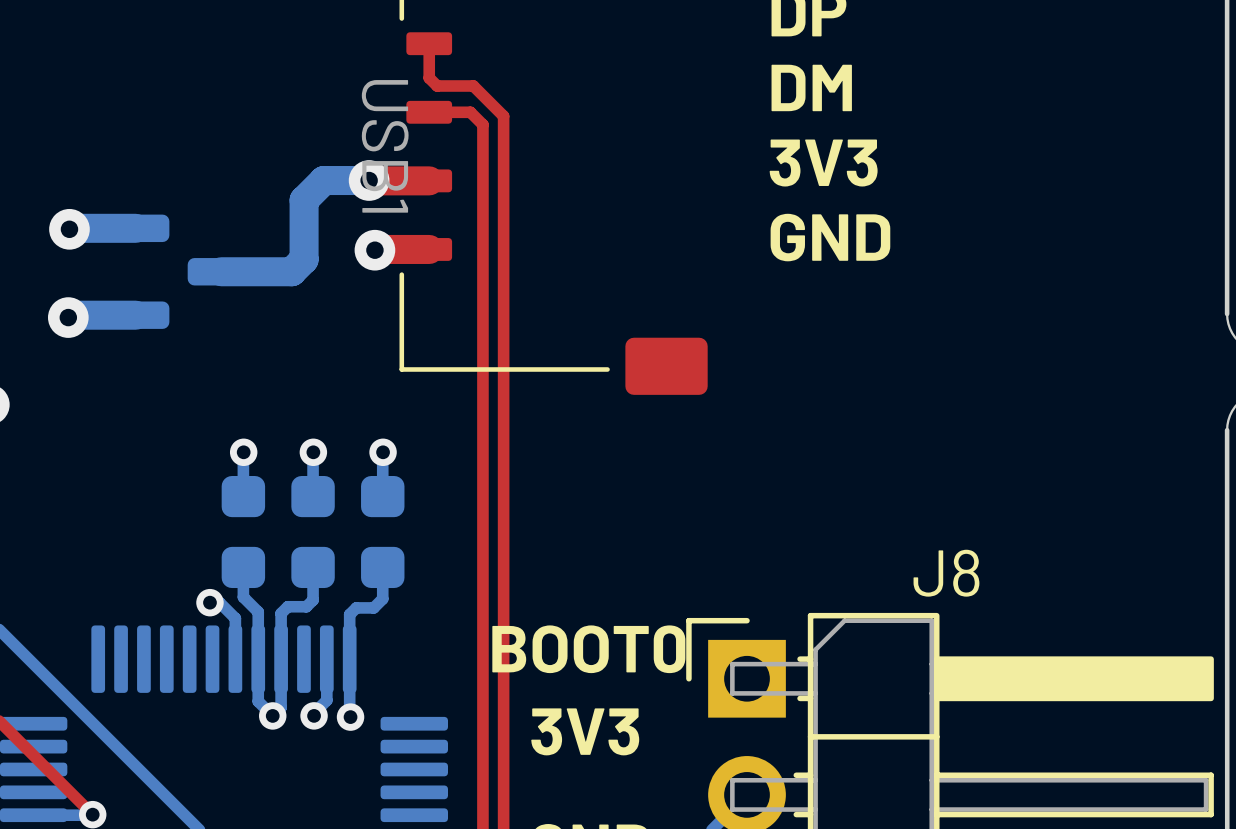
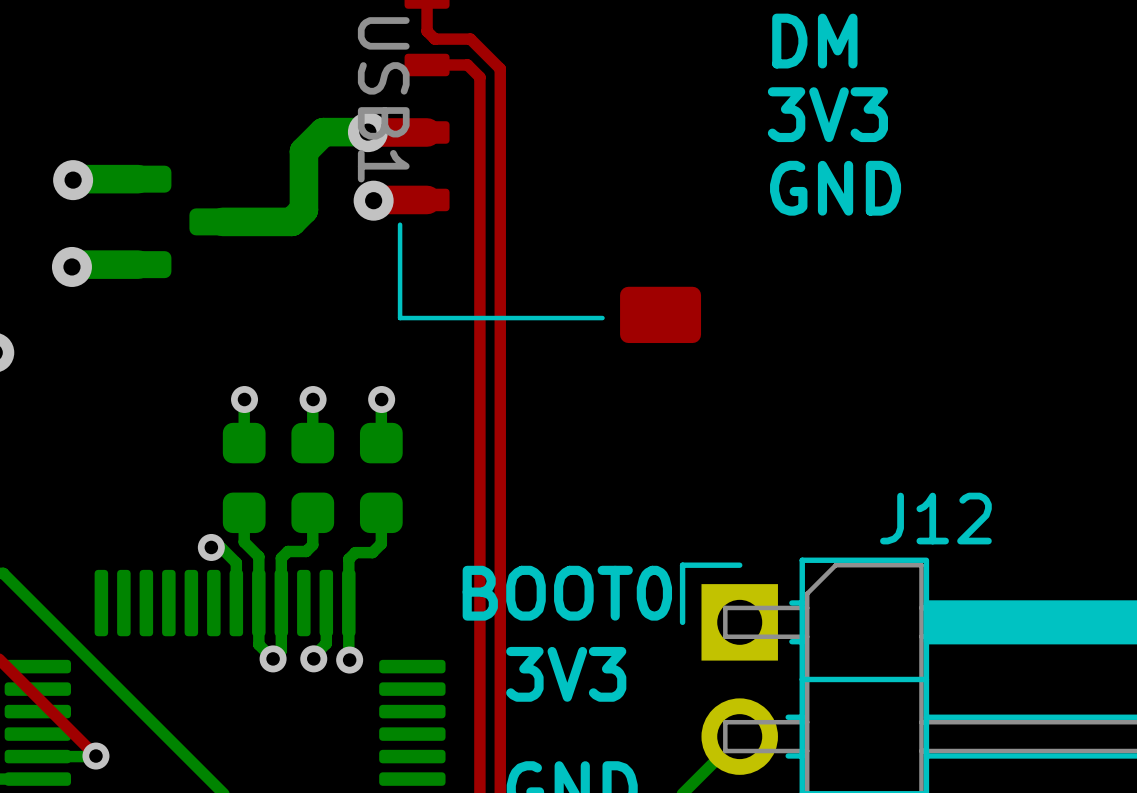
J8 name: J8 (946, 573) -> J12 (935, 518)

